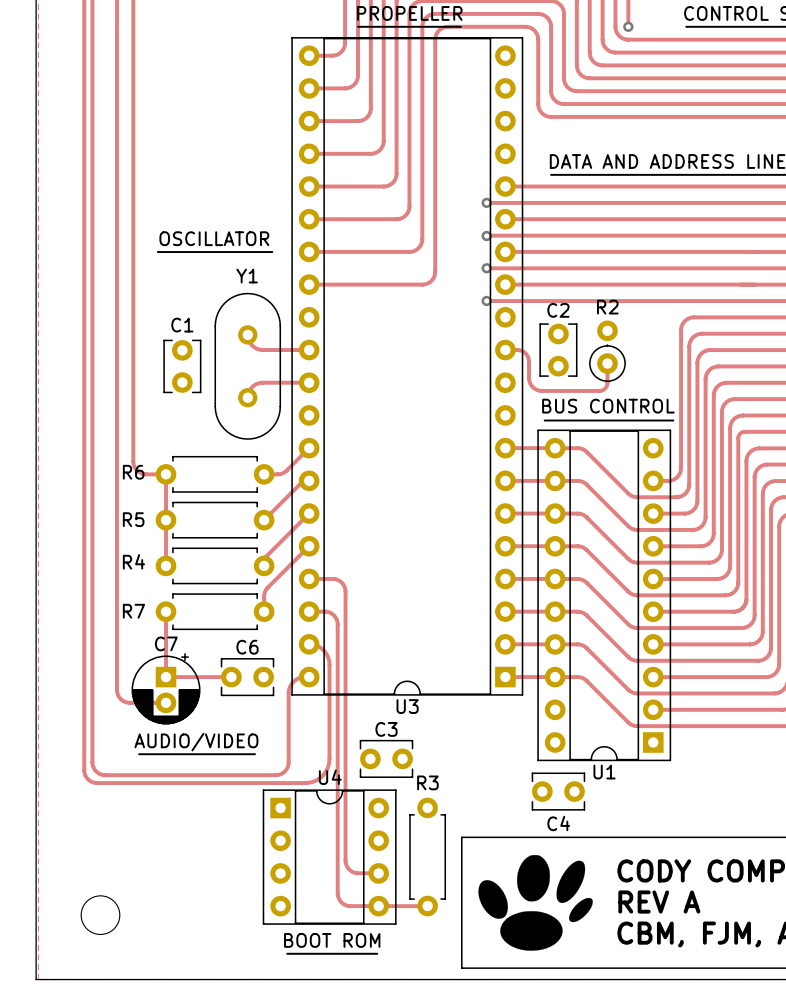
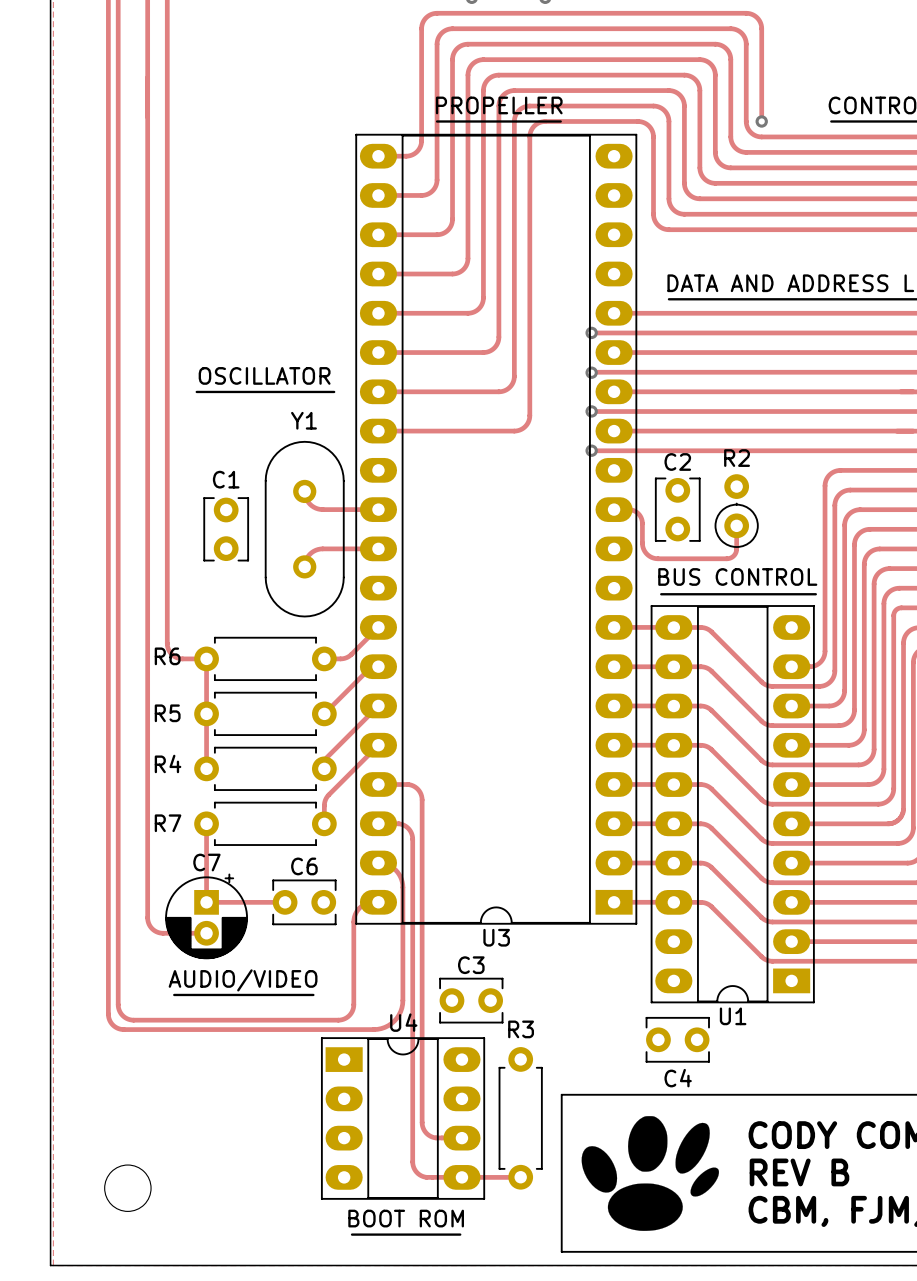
U3 footprint: [291, 37, 524, 696] -> [355, 133, 638, 925]
U1 footprint: [537, 429, 672, 762] -> [650, 605, 815, 1004]
U4 footprint: [262, 789, 397, 925] -> [320, 1037, 486, 1200]
text: REV A (659, 902) -> REV B (799, 1172)

